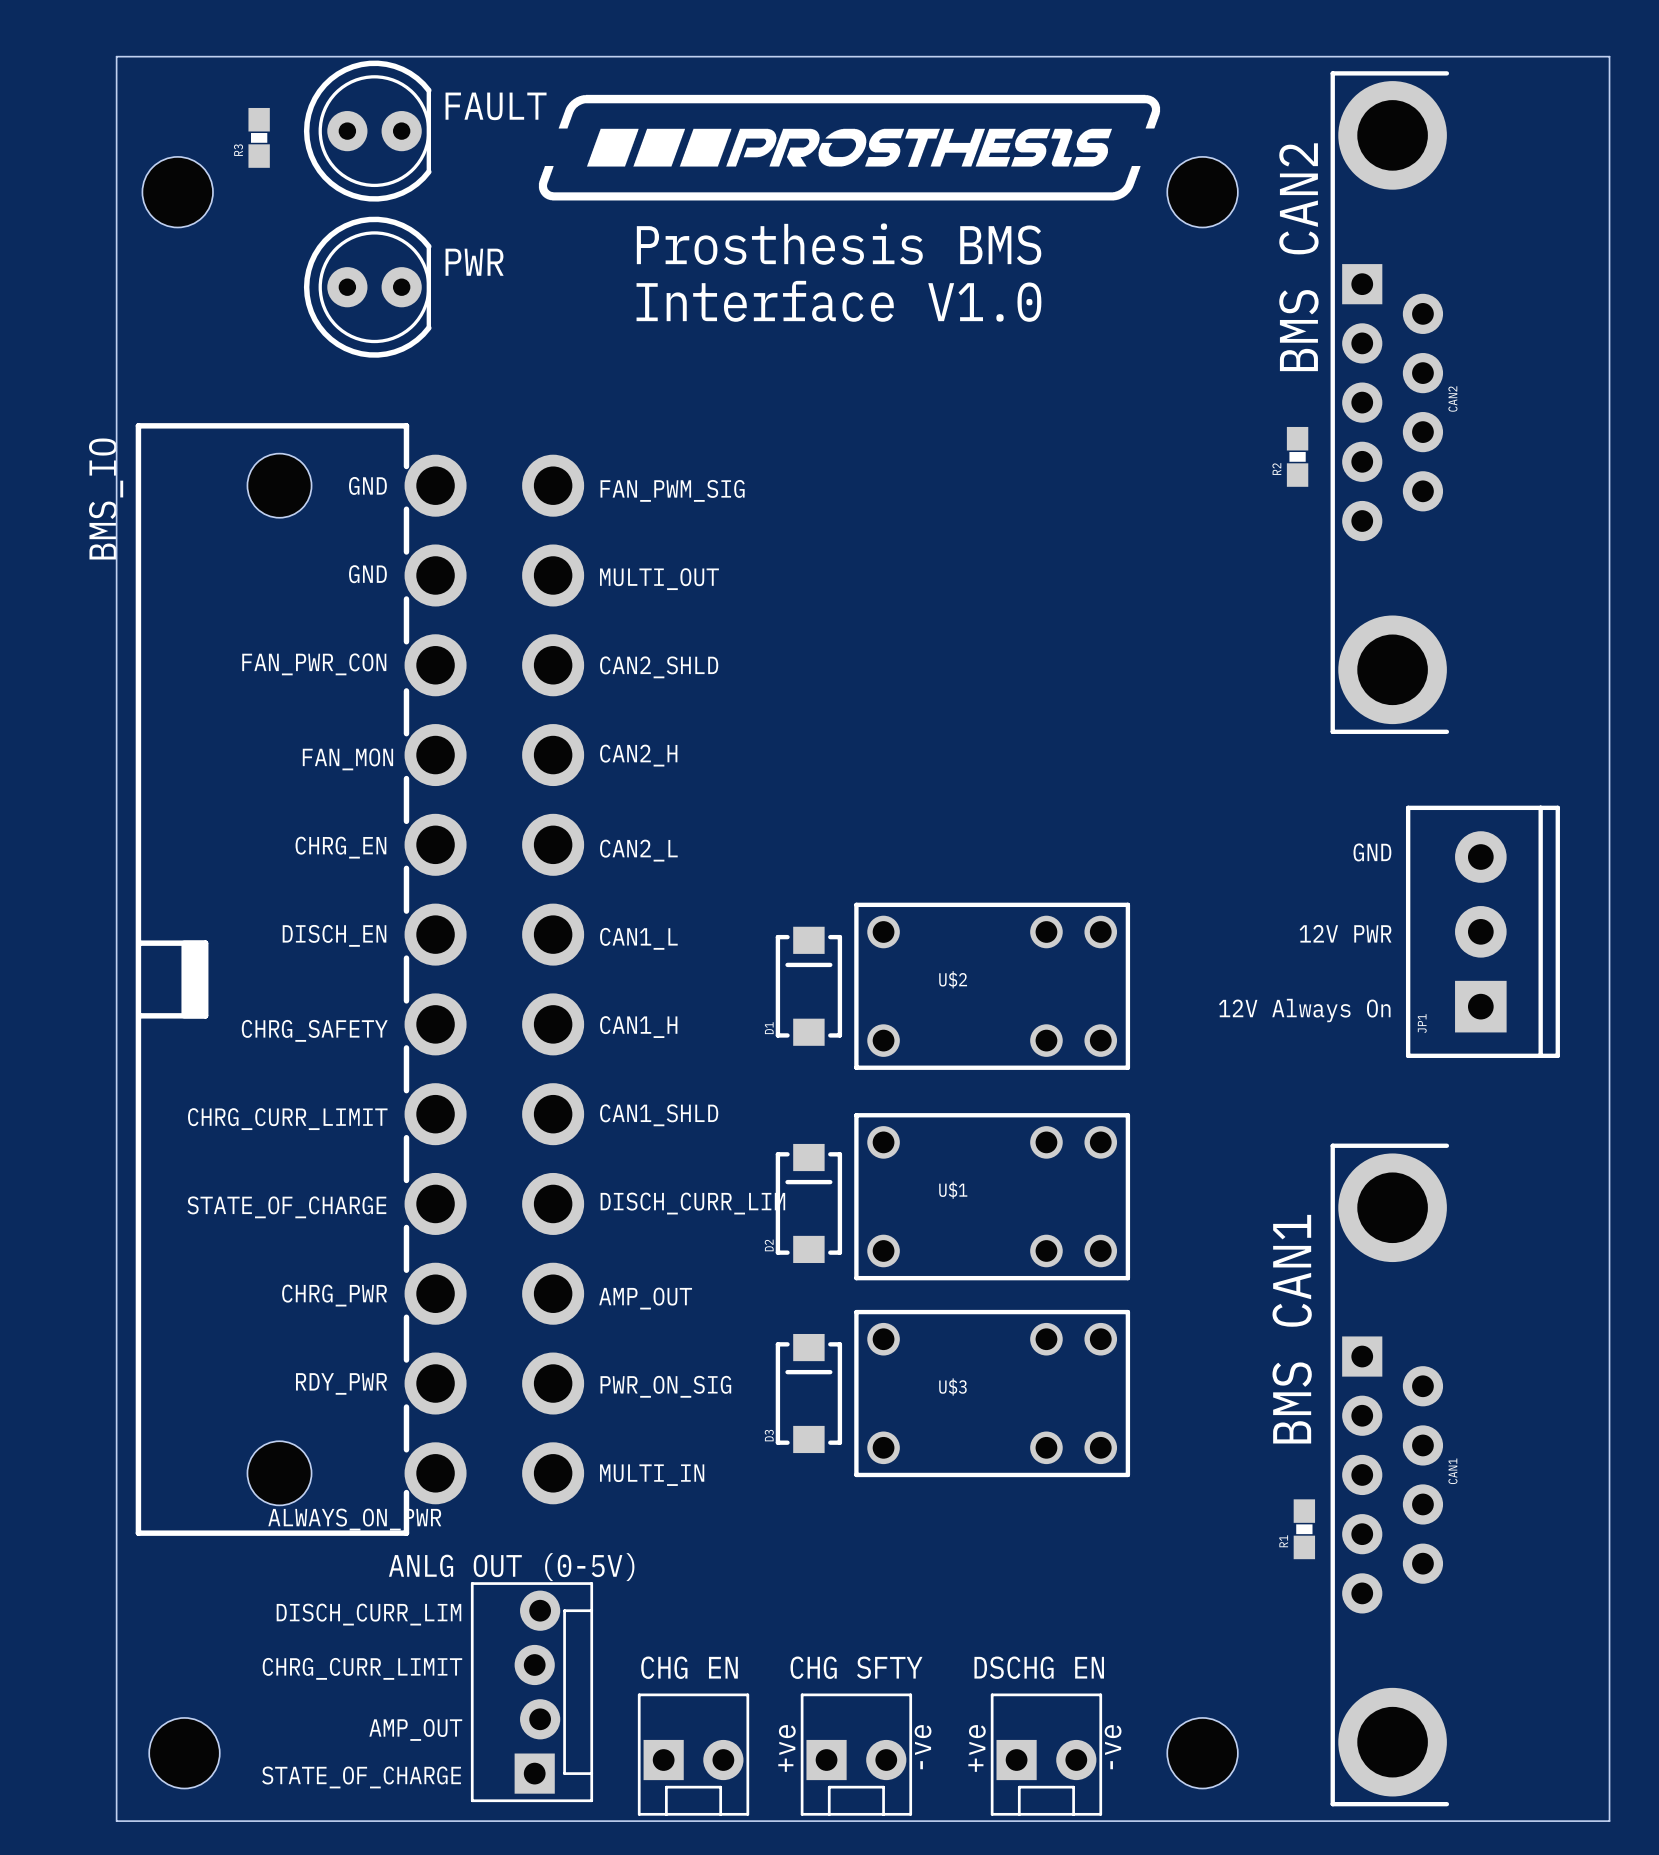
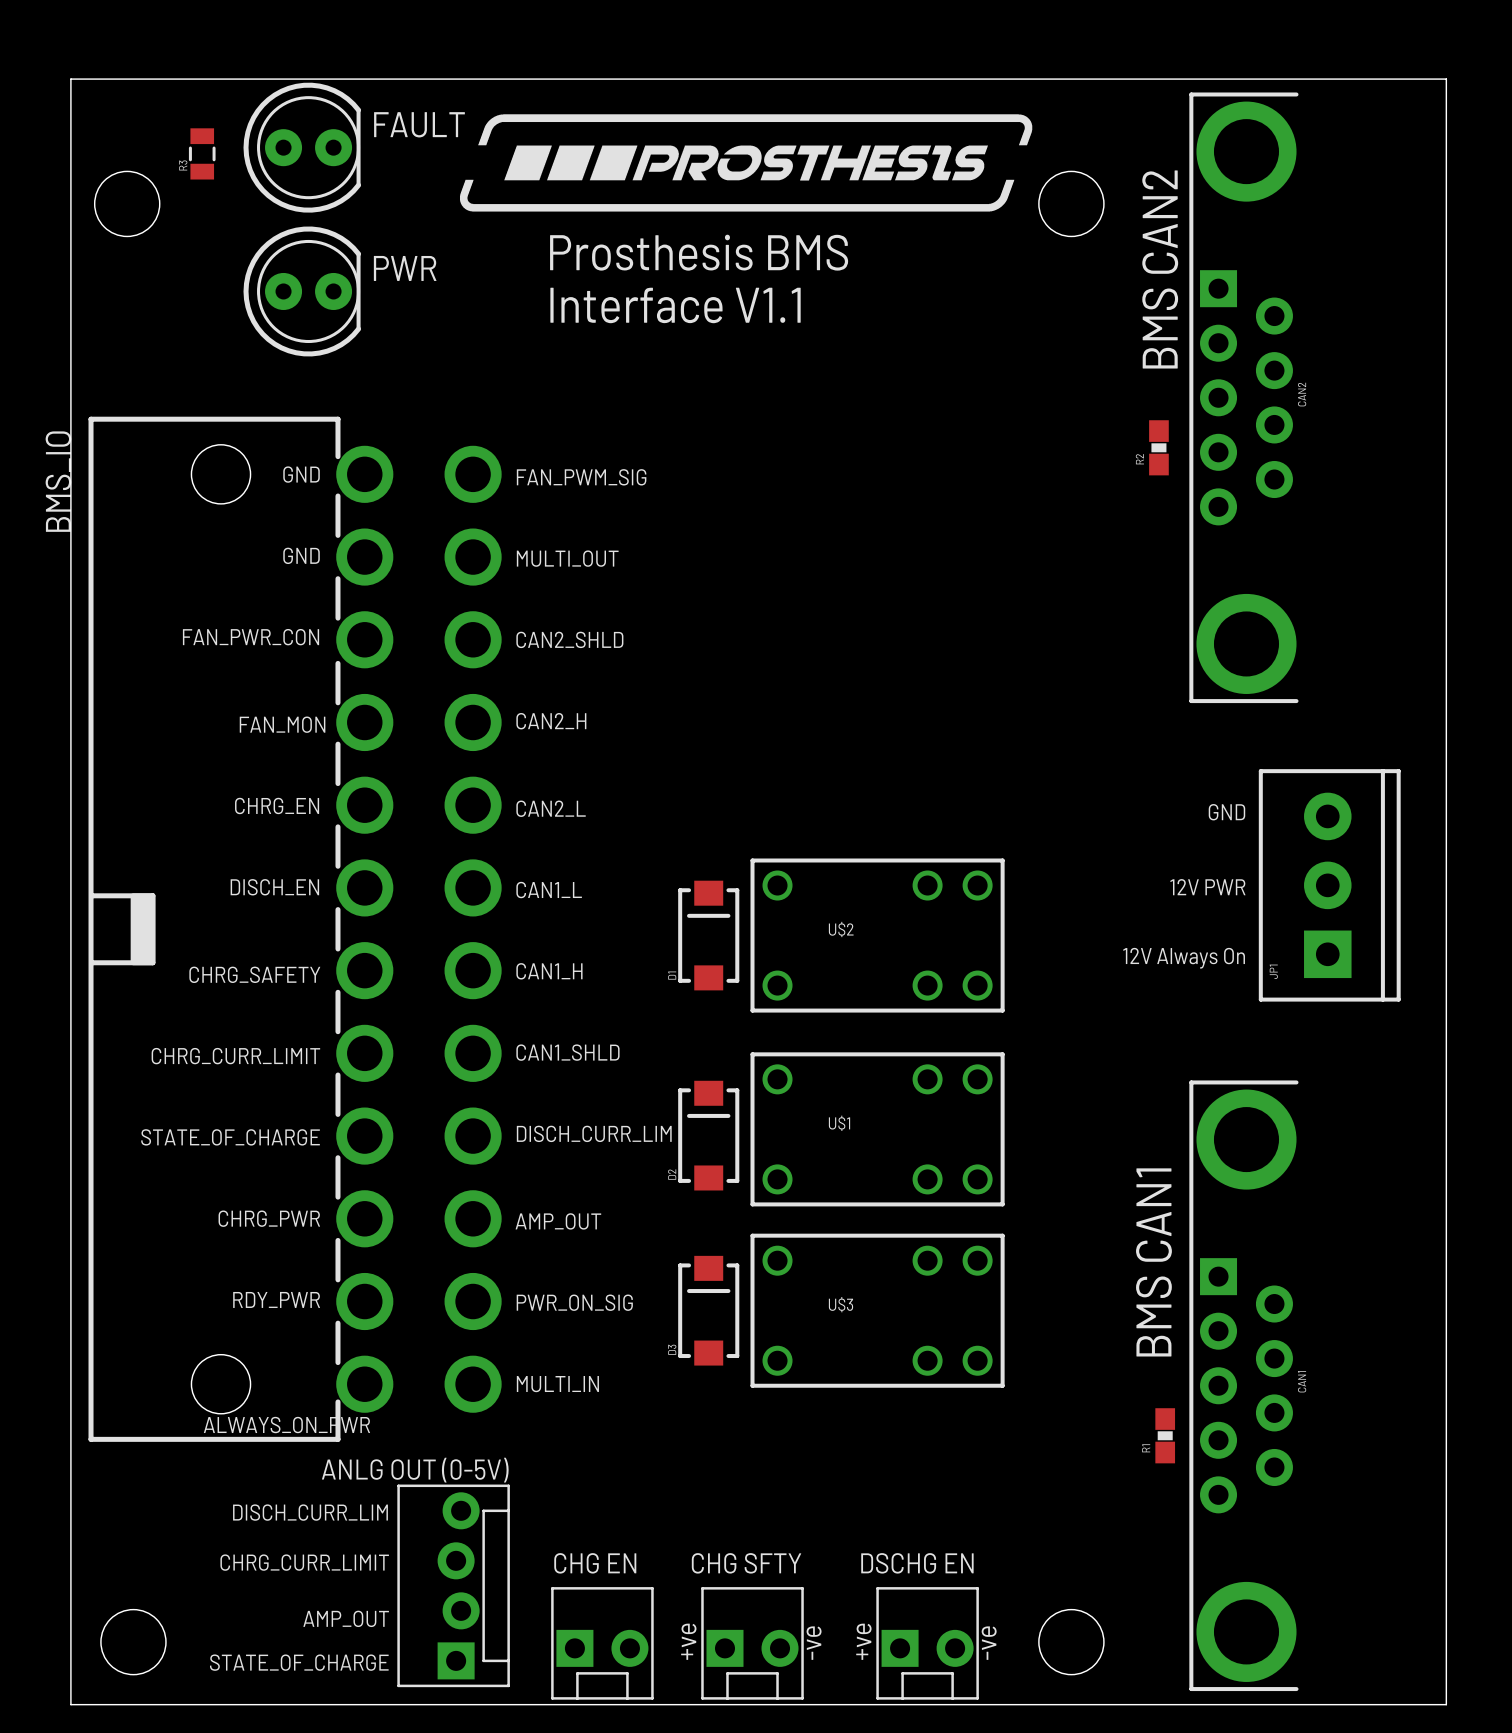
R3 footprint: [248, 107, 270, 168] -> [188, 128, 216, 180]
text: Interface V1.0 (838, 301) -> Interface V1.1 (675, 305)

